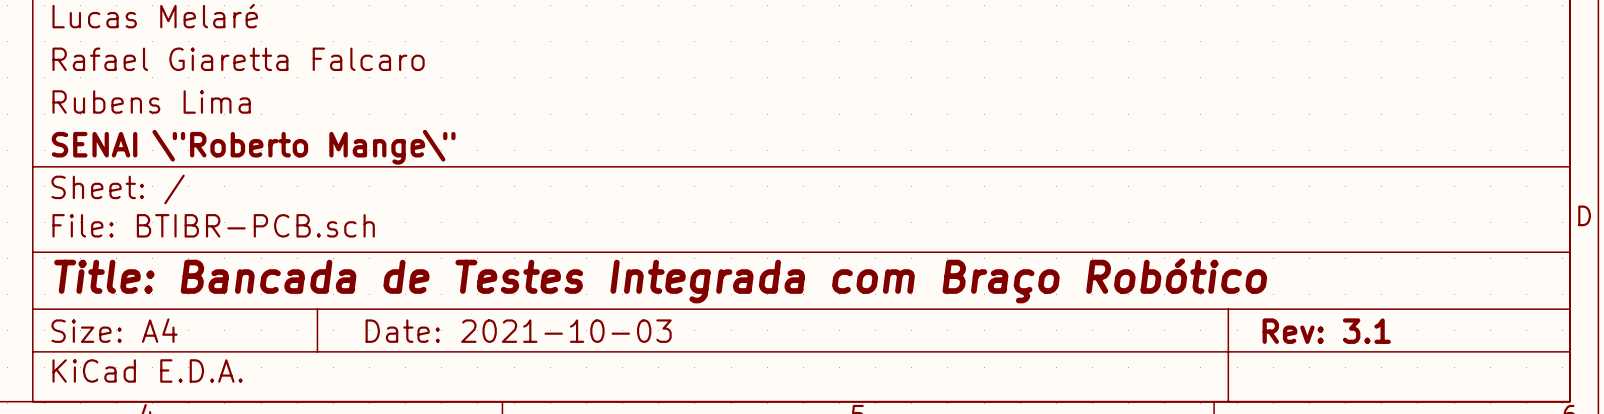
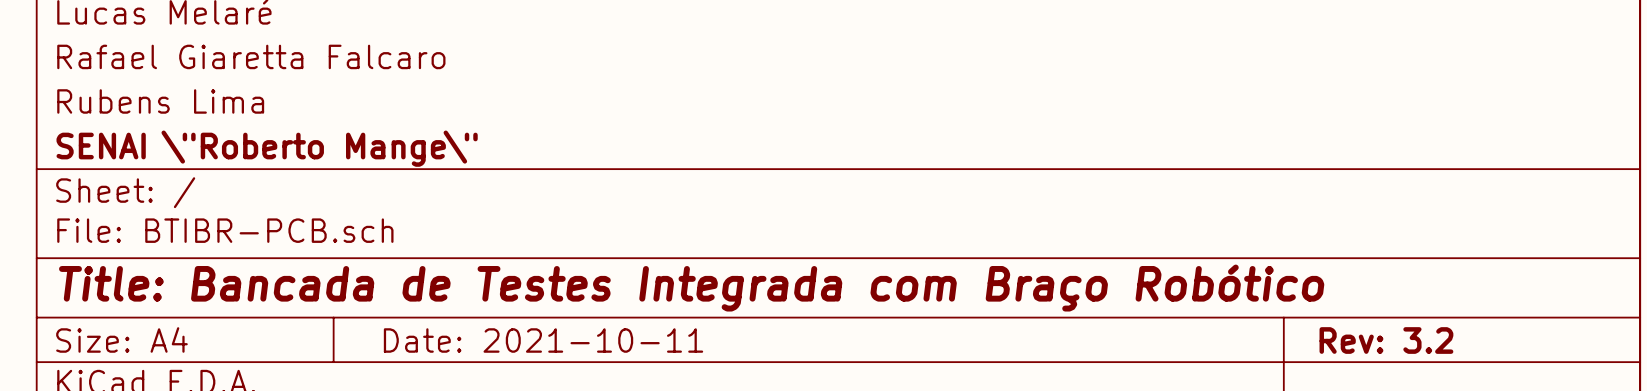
title block: Date: 2021-10-03 (518, 331) -> Date: 2021-10-11 (543, 340)
title block: Rev: 3.1 (1326, 331) -> Rev: 3.2 (1386, 340)

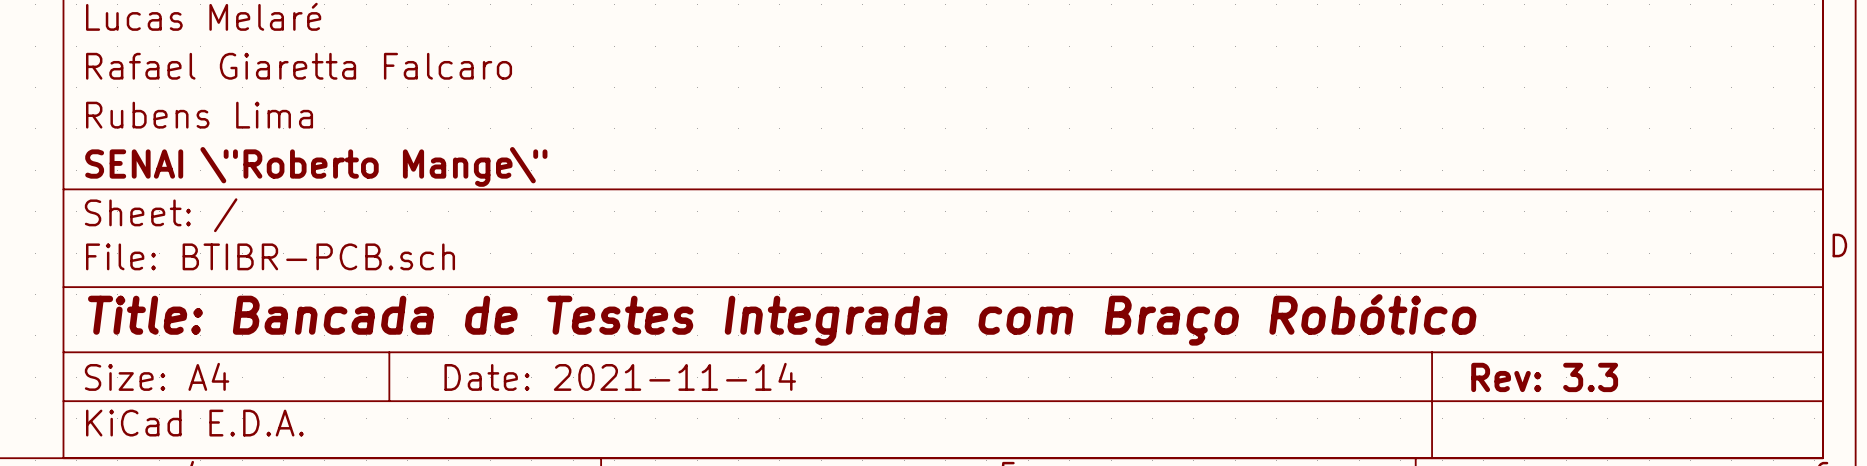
title block: Date: 2021-10-11 (543, 340) -> Date: 2021-11-14 (620, 376)
title block: Rev: 3.2 (1386, 340) -> Rev: 3.3 (1544, 377)

